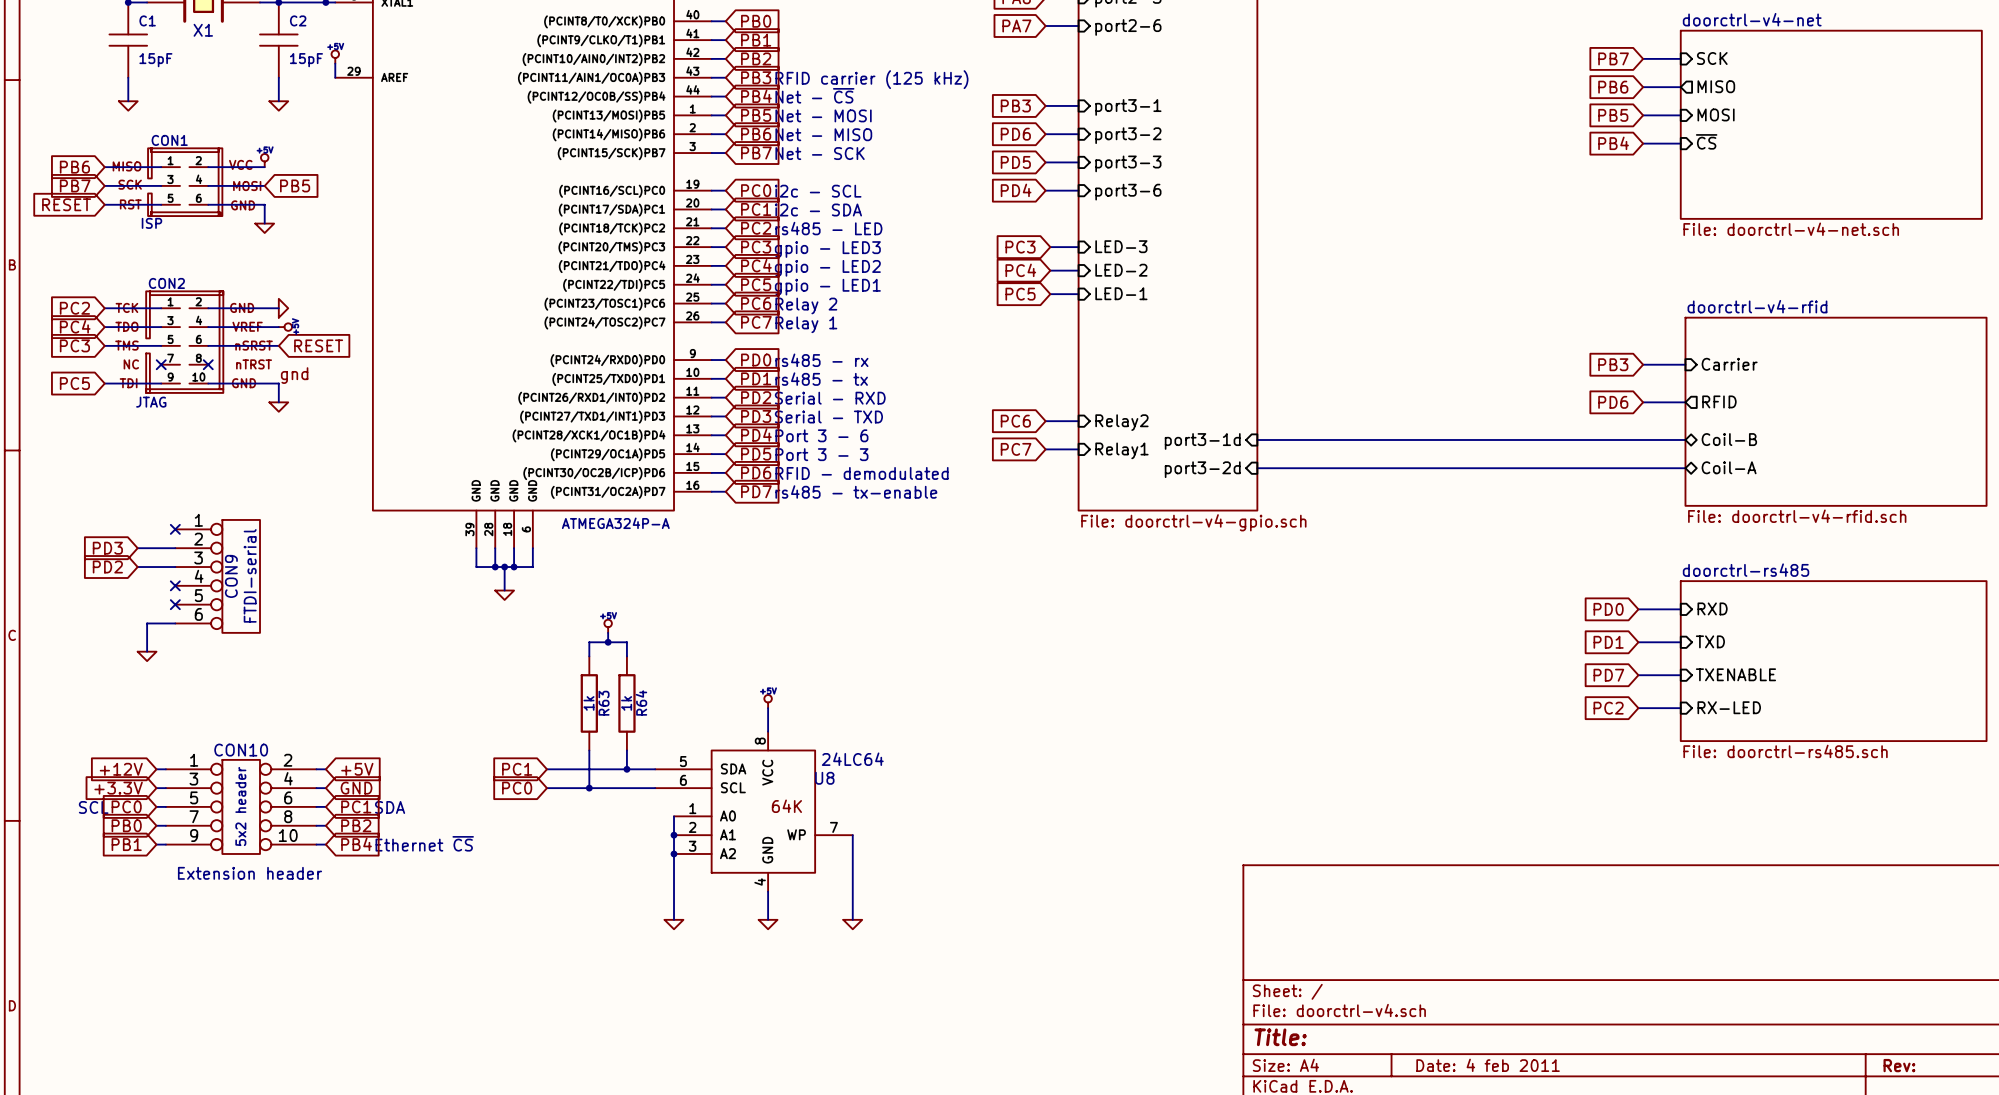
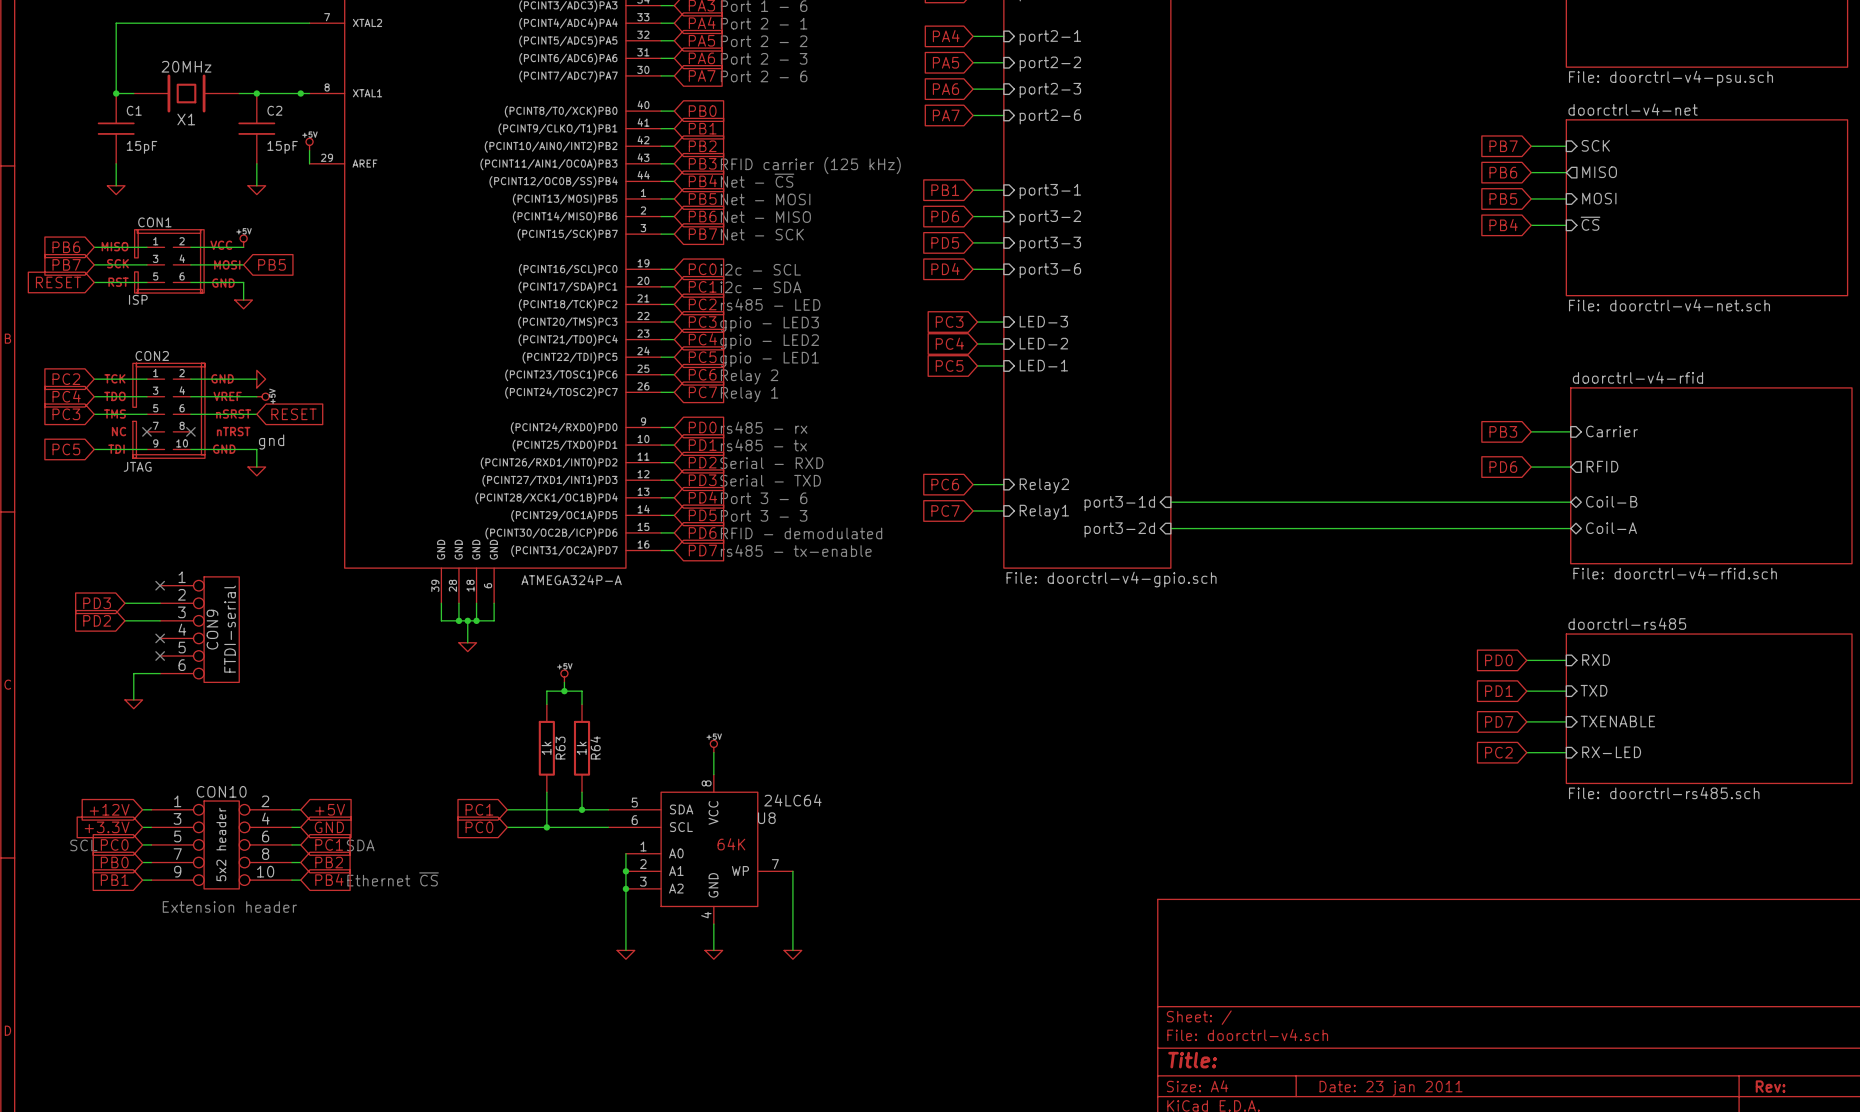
global label: PB3 (1015, 105) -> PB1 (945, 190)
title block: Date: 4 feb 2011 (1488, 1065) -> Date: 23 jan 2011 (1391, 1088)

